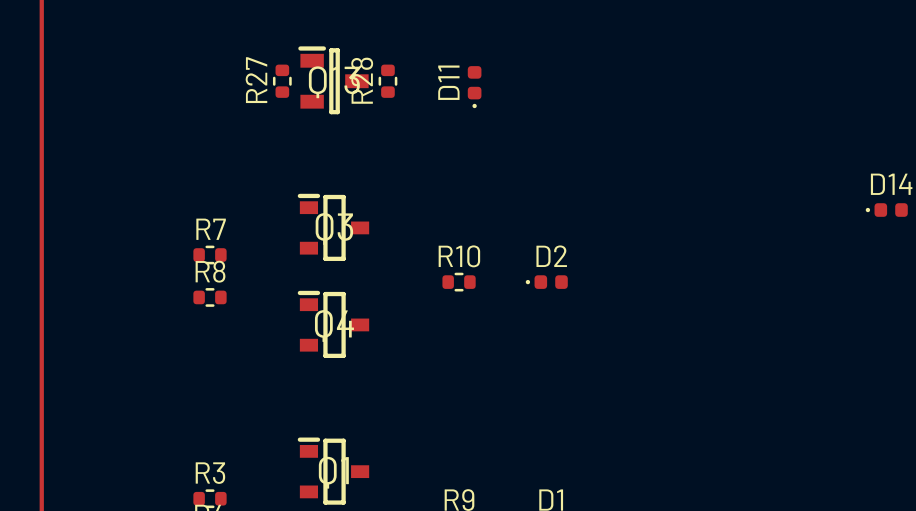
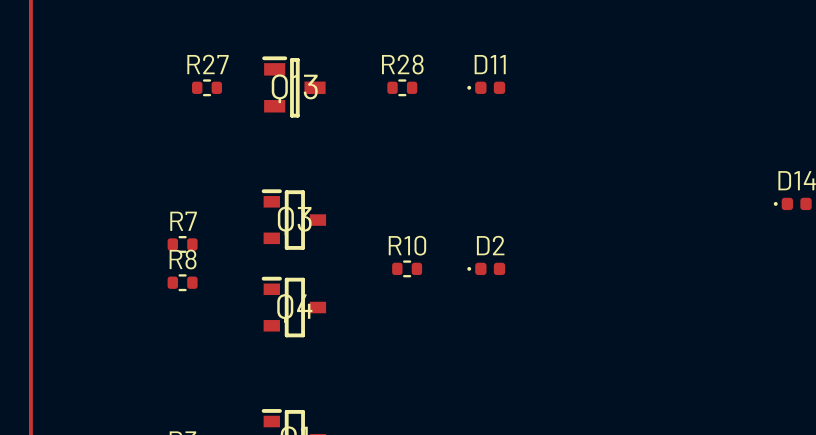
R27 rotation: 0° (282, 81) -> 90° clockwise (207, 87)
R27 position: (282, 81) -> (207, 87)
R28 rotation: 0° (387, 81) -> 90° clockwise (402, 87)
R28 position: (387, 81) -> (402, 87)
D11 rotation: 0° (474, 87) -> 90° clockwise (486, 87)
D11 position: (474, 87) -> (486, 87)

